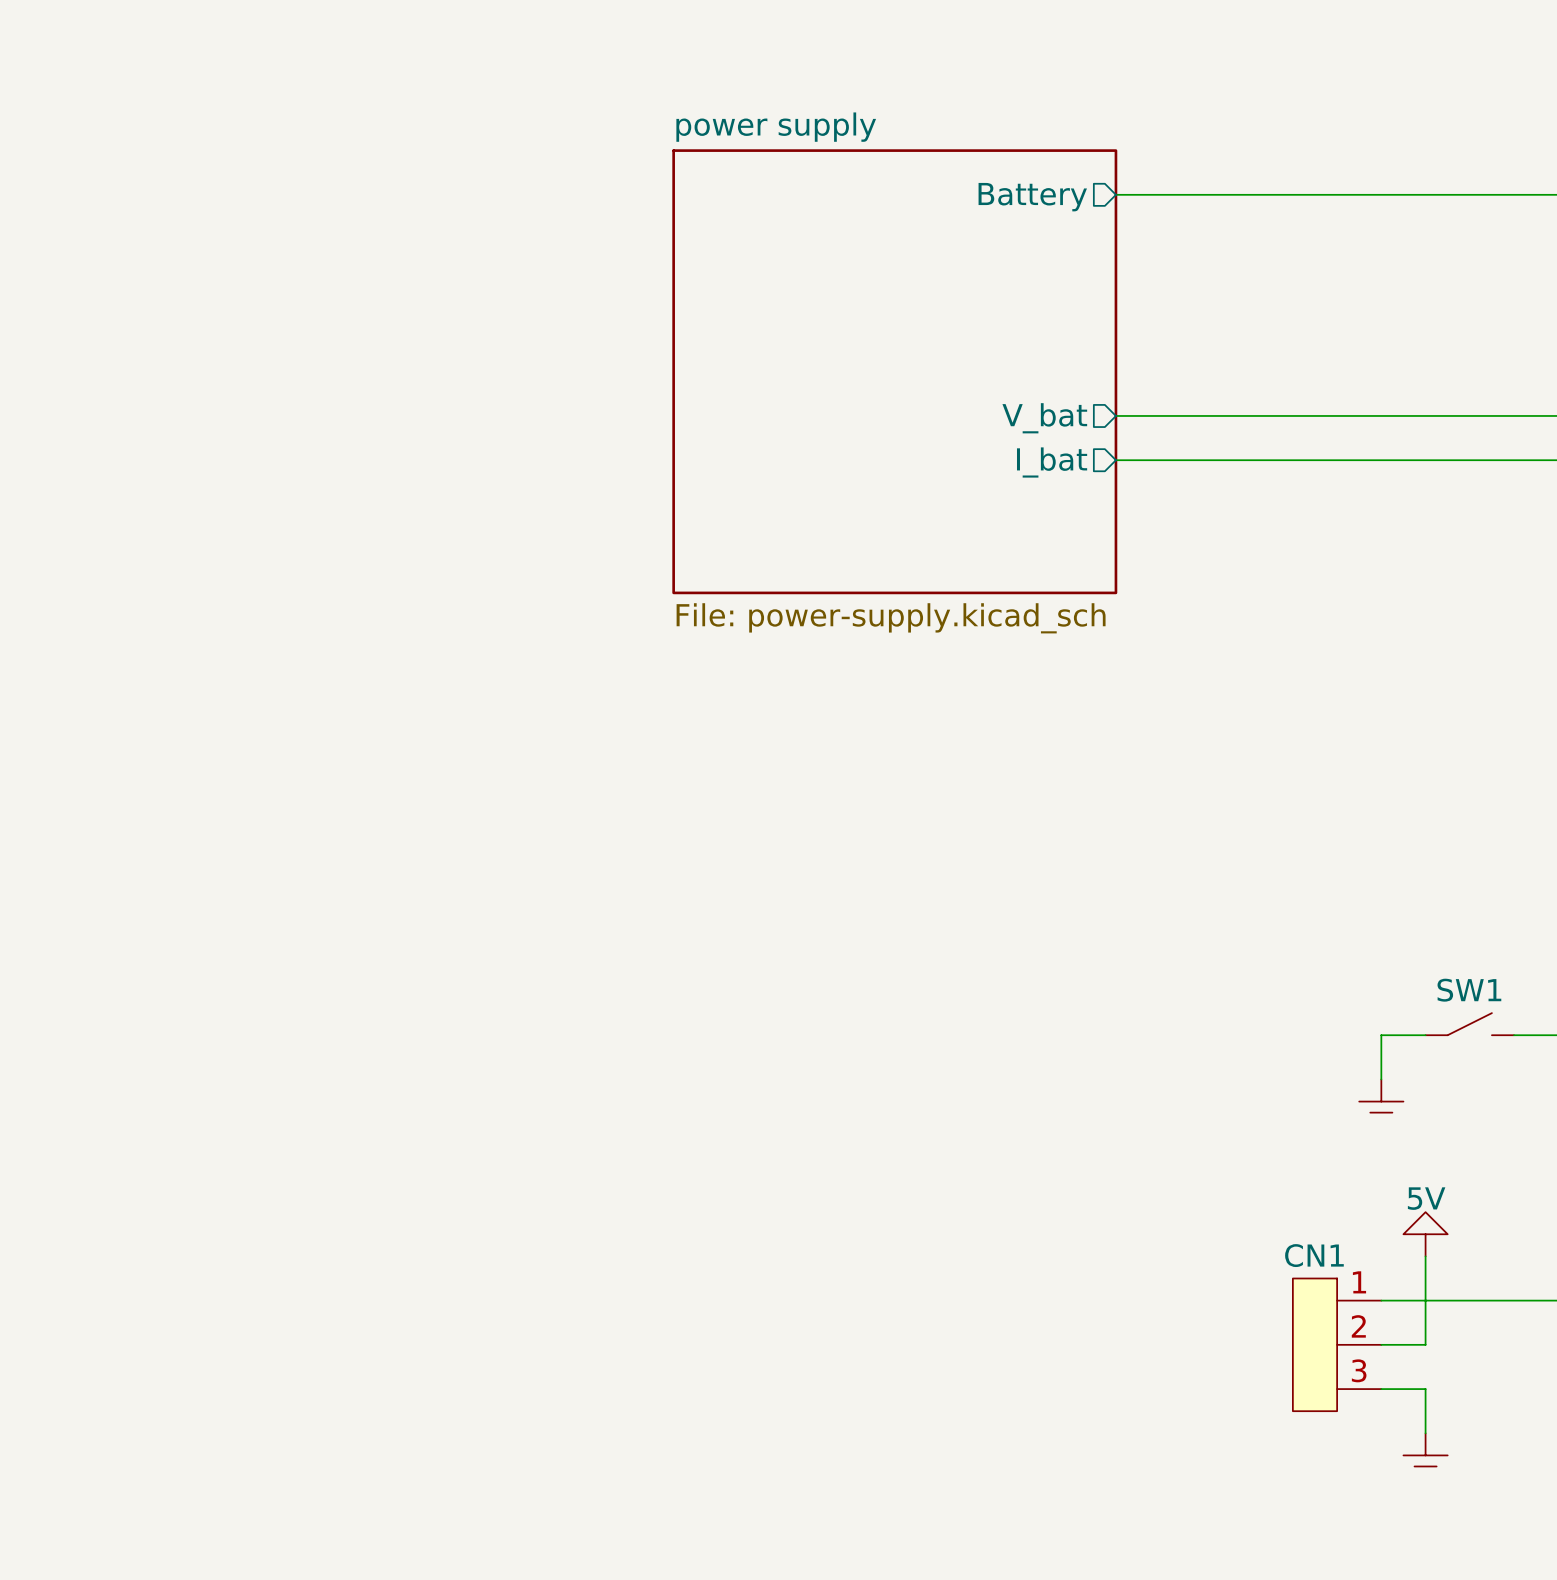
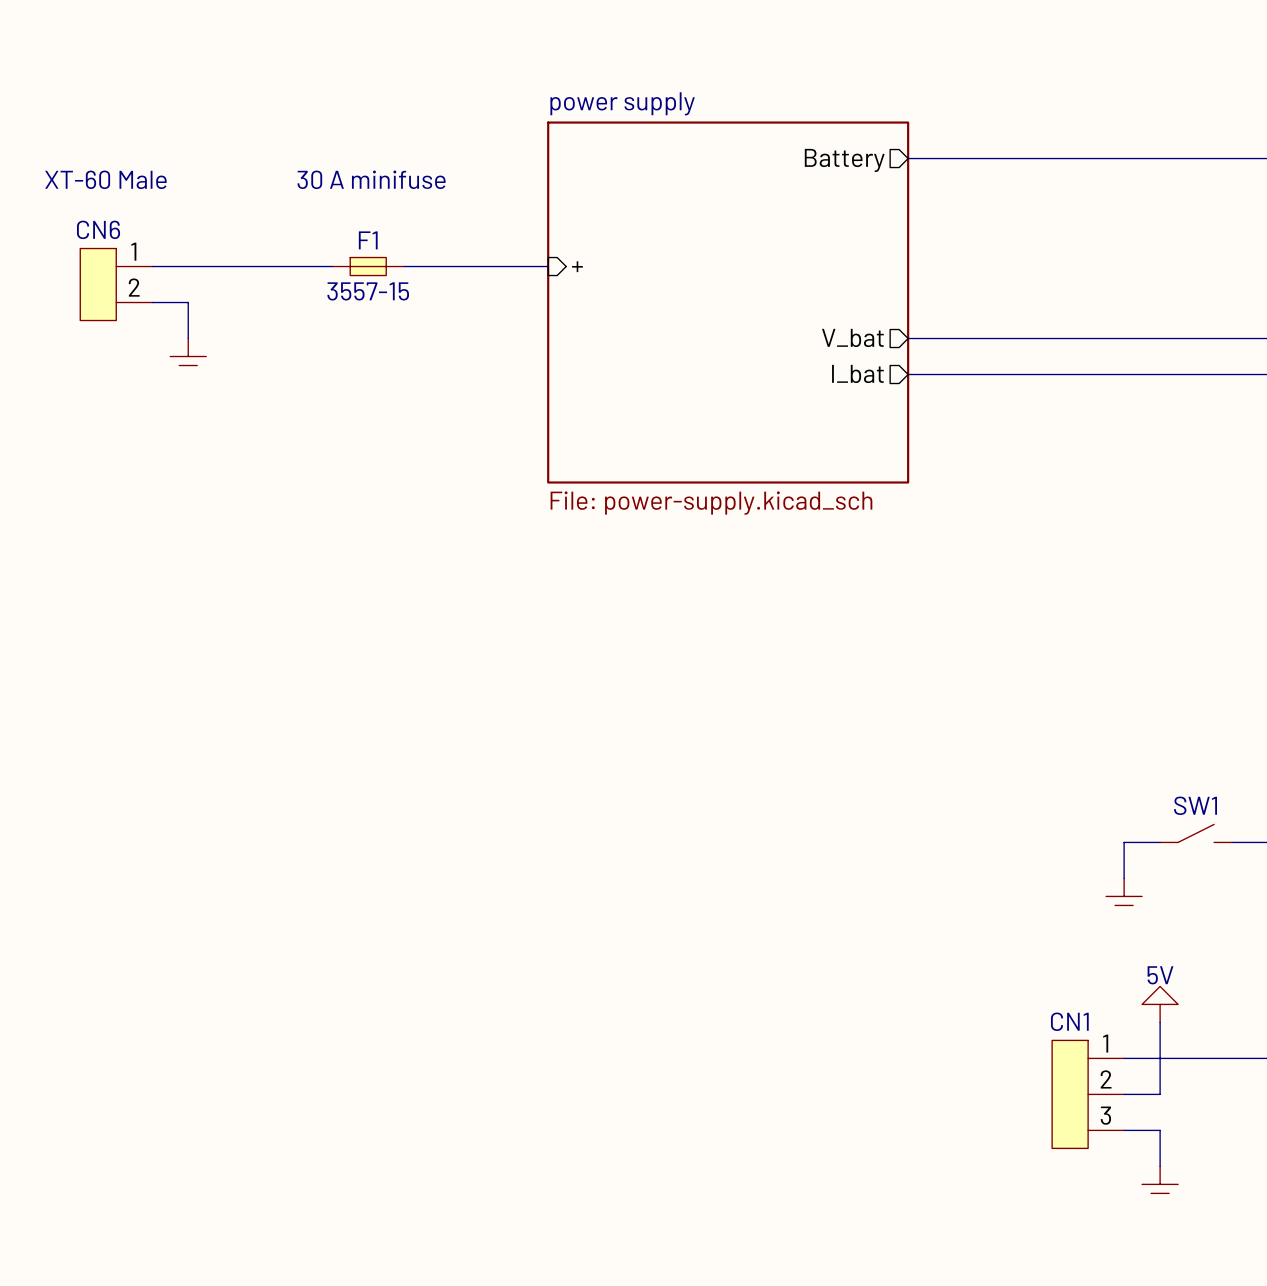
text: none -> XT-60 Male (105, 179)
text: none -> 30 A minifuse (371, 179)
wire: none -> (152, 266) (332, 266)
F1: none -> (368, 266)
wire: none -> (404, 266) (548, 266)
sheet pin: none -> + (577, 266)
CN6: none -> (116, 284)
wire: none -> (152, 302) (188, 302) (188, 338)
power symbol: none -> (188, 356)

